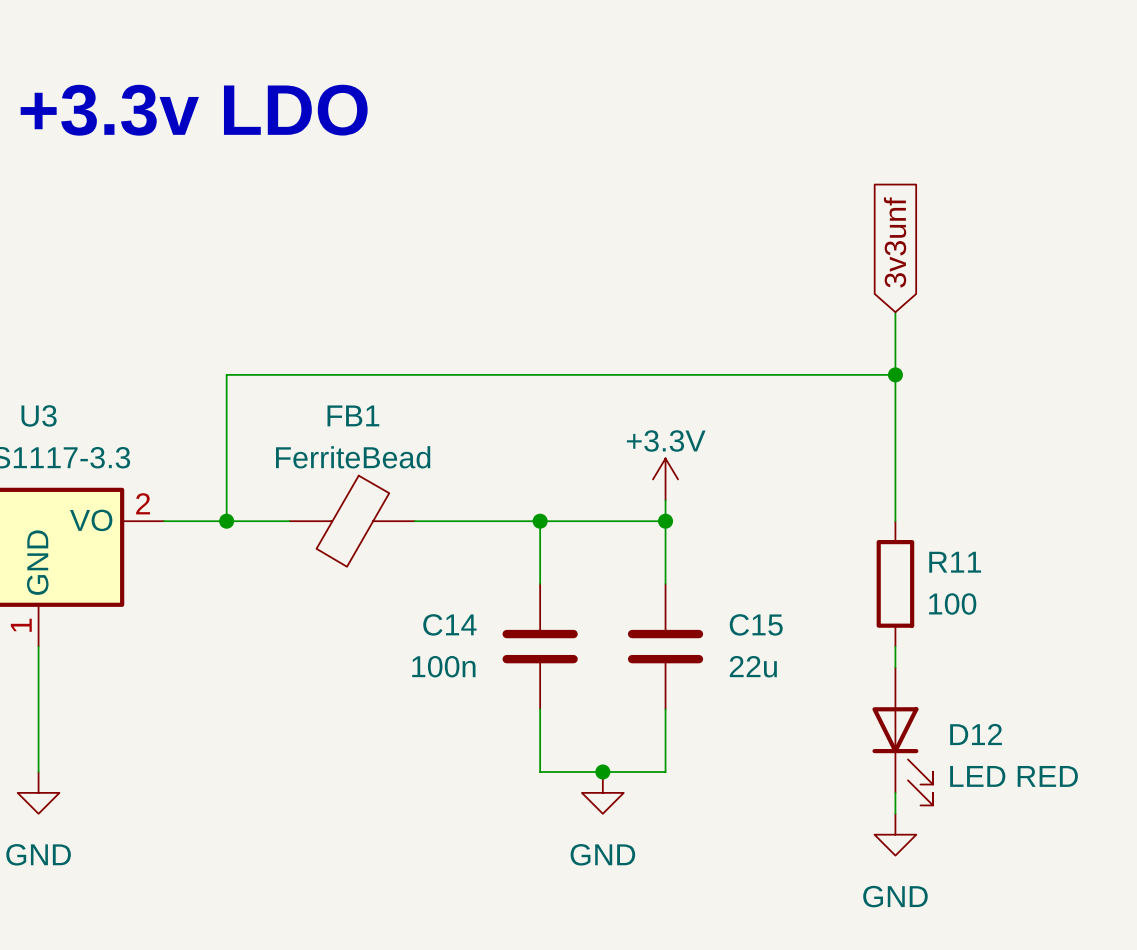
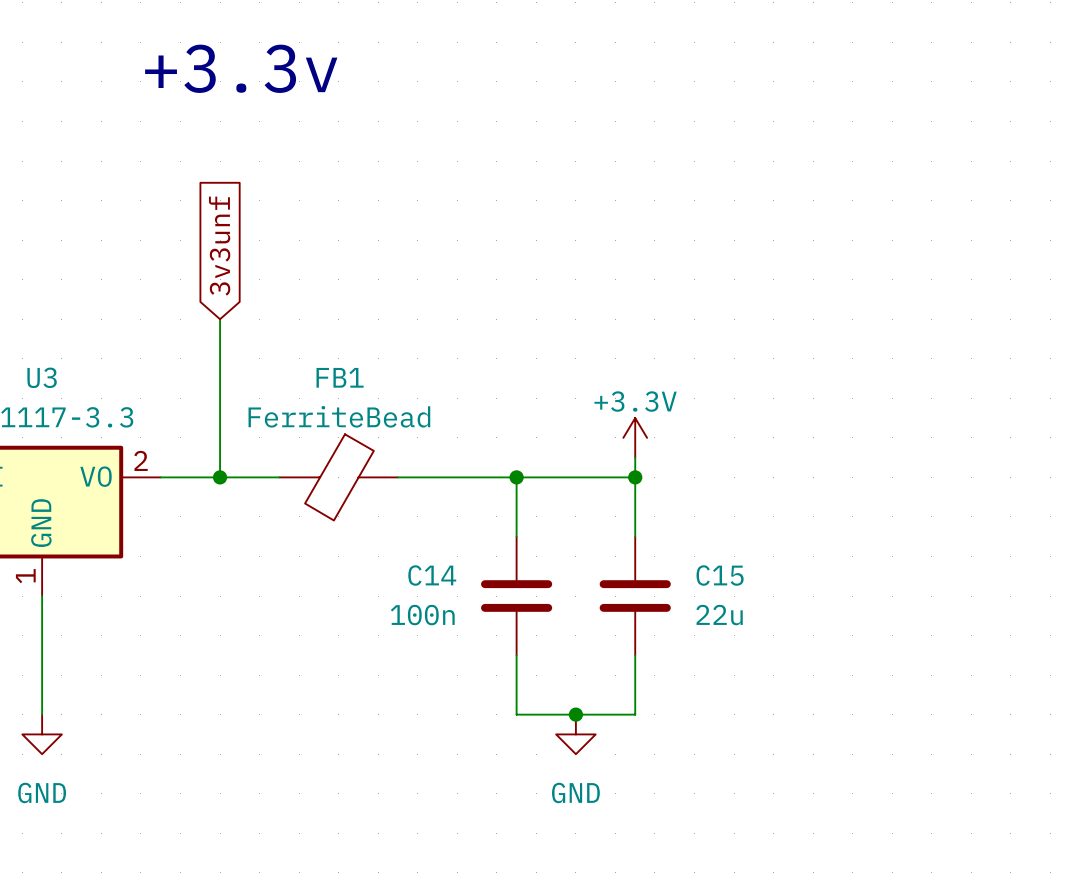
text: +3.3v LDO (194, 110) -> +3.3v (241, 68)
global label: 3v3unf (895, 242) -> none
global label: none -> 3v3unf (219, 246)
wire: (895, 312) (895, 521) -> none
wire: (226, 374) (895, 374) -> (220, 339) (220, 319)
junction: (895, 374) -> none
R11: 100 (895, 583) -> none
wire: (895, 646) (895, 667) -> none
D12: LED RED (902, 736) -> none
wire: (895, 792) (895, 813) -> none
power symbol: GND (895, 834) -> none

